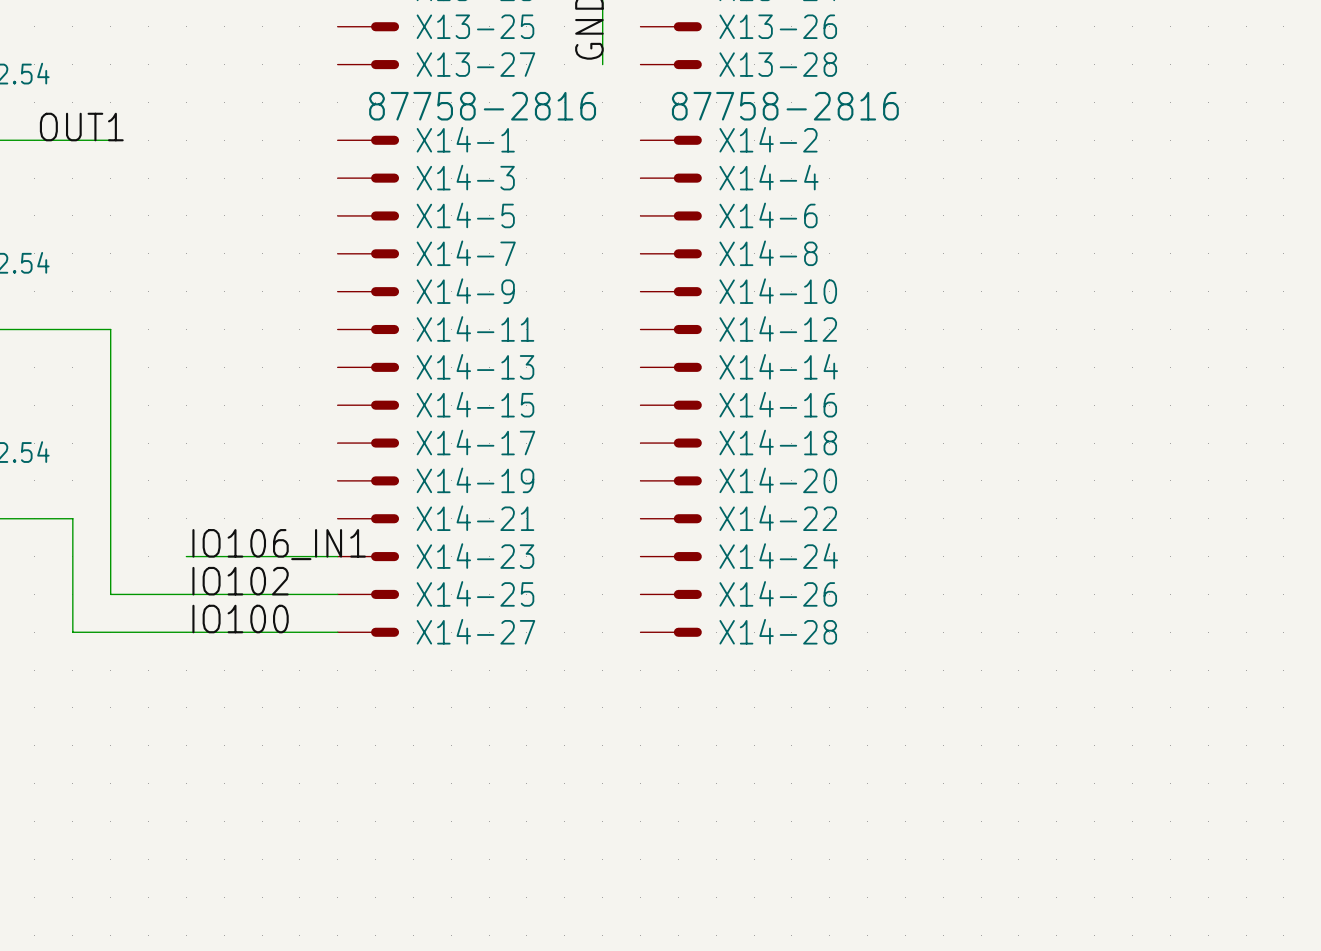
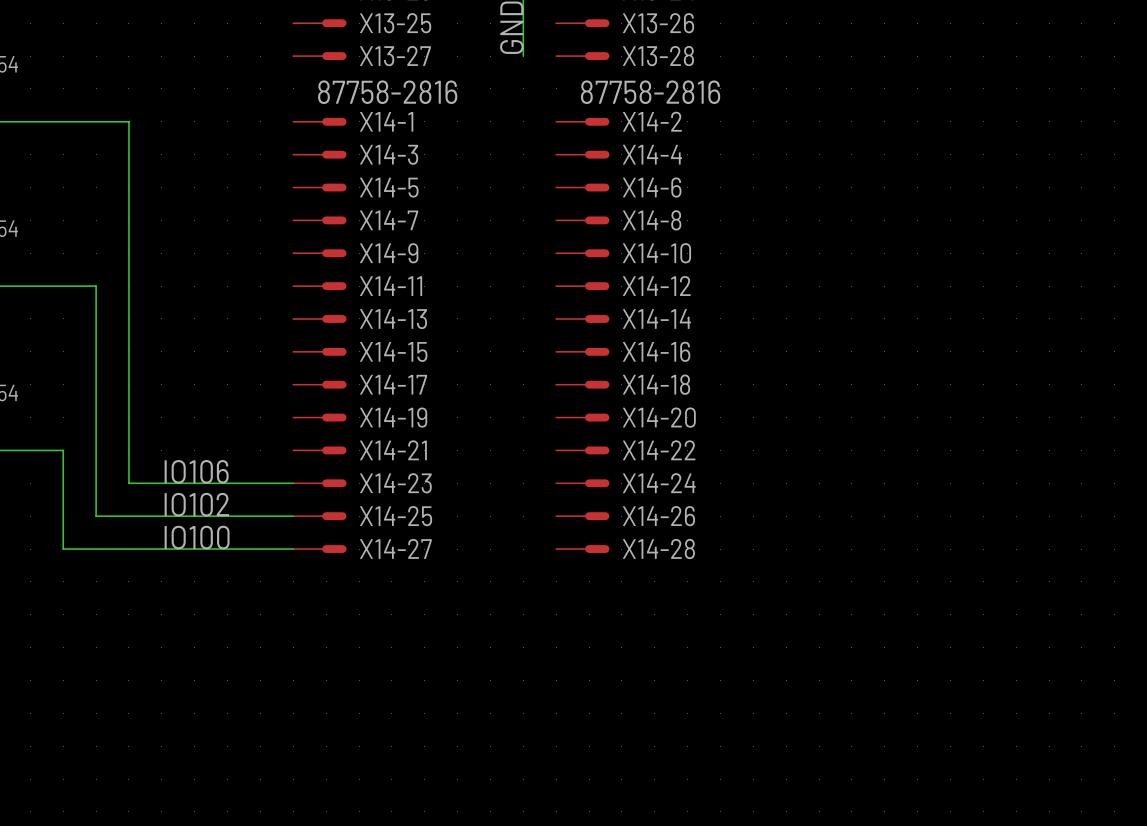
label: OUT1 (81, 127) -> none
wire: none -> (96, 121) (128, 121) (128, 483) (161, 483)
label: IO106_IN1 (279, 544) -> IO106 (196, 471)

